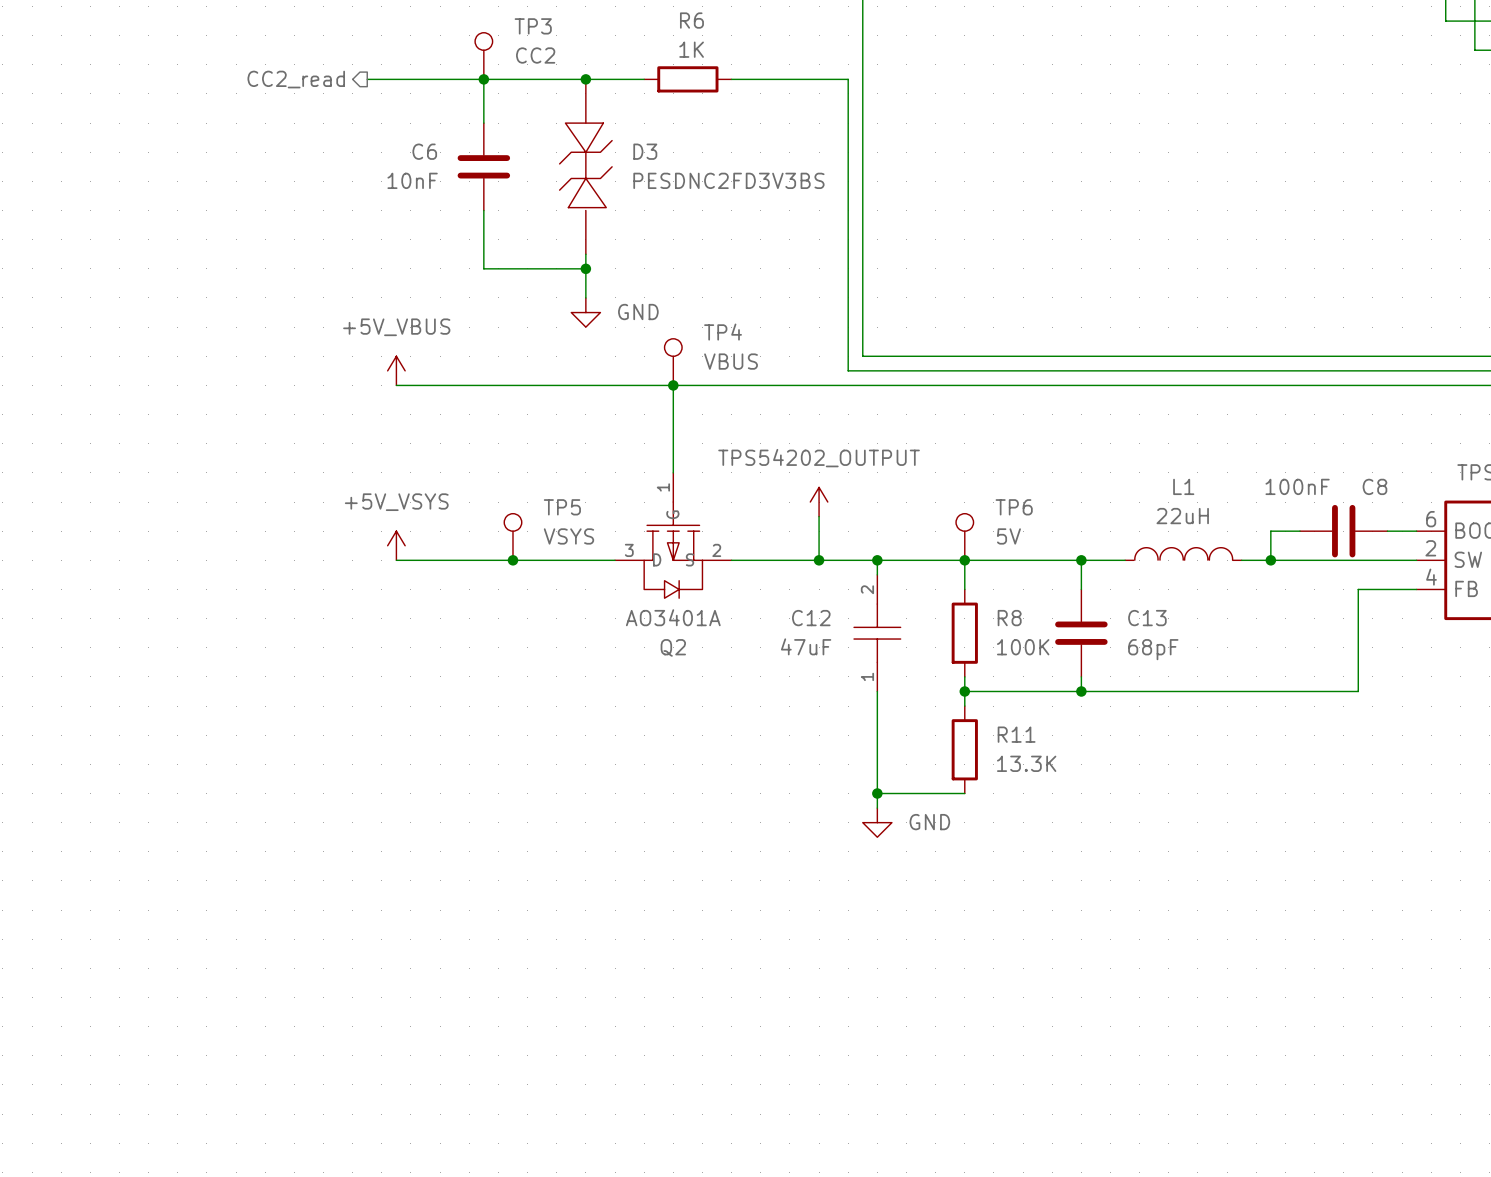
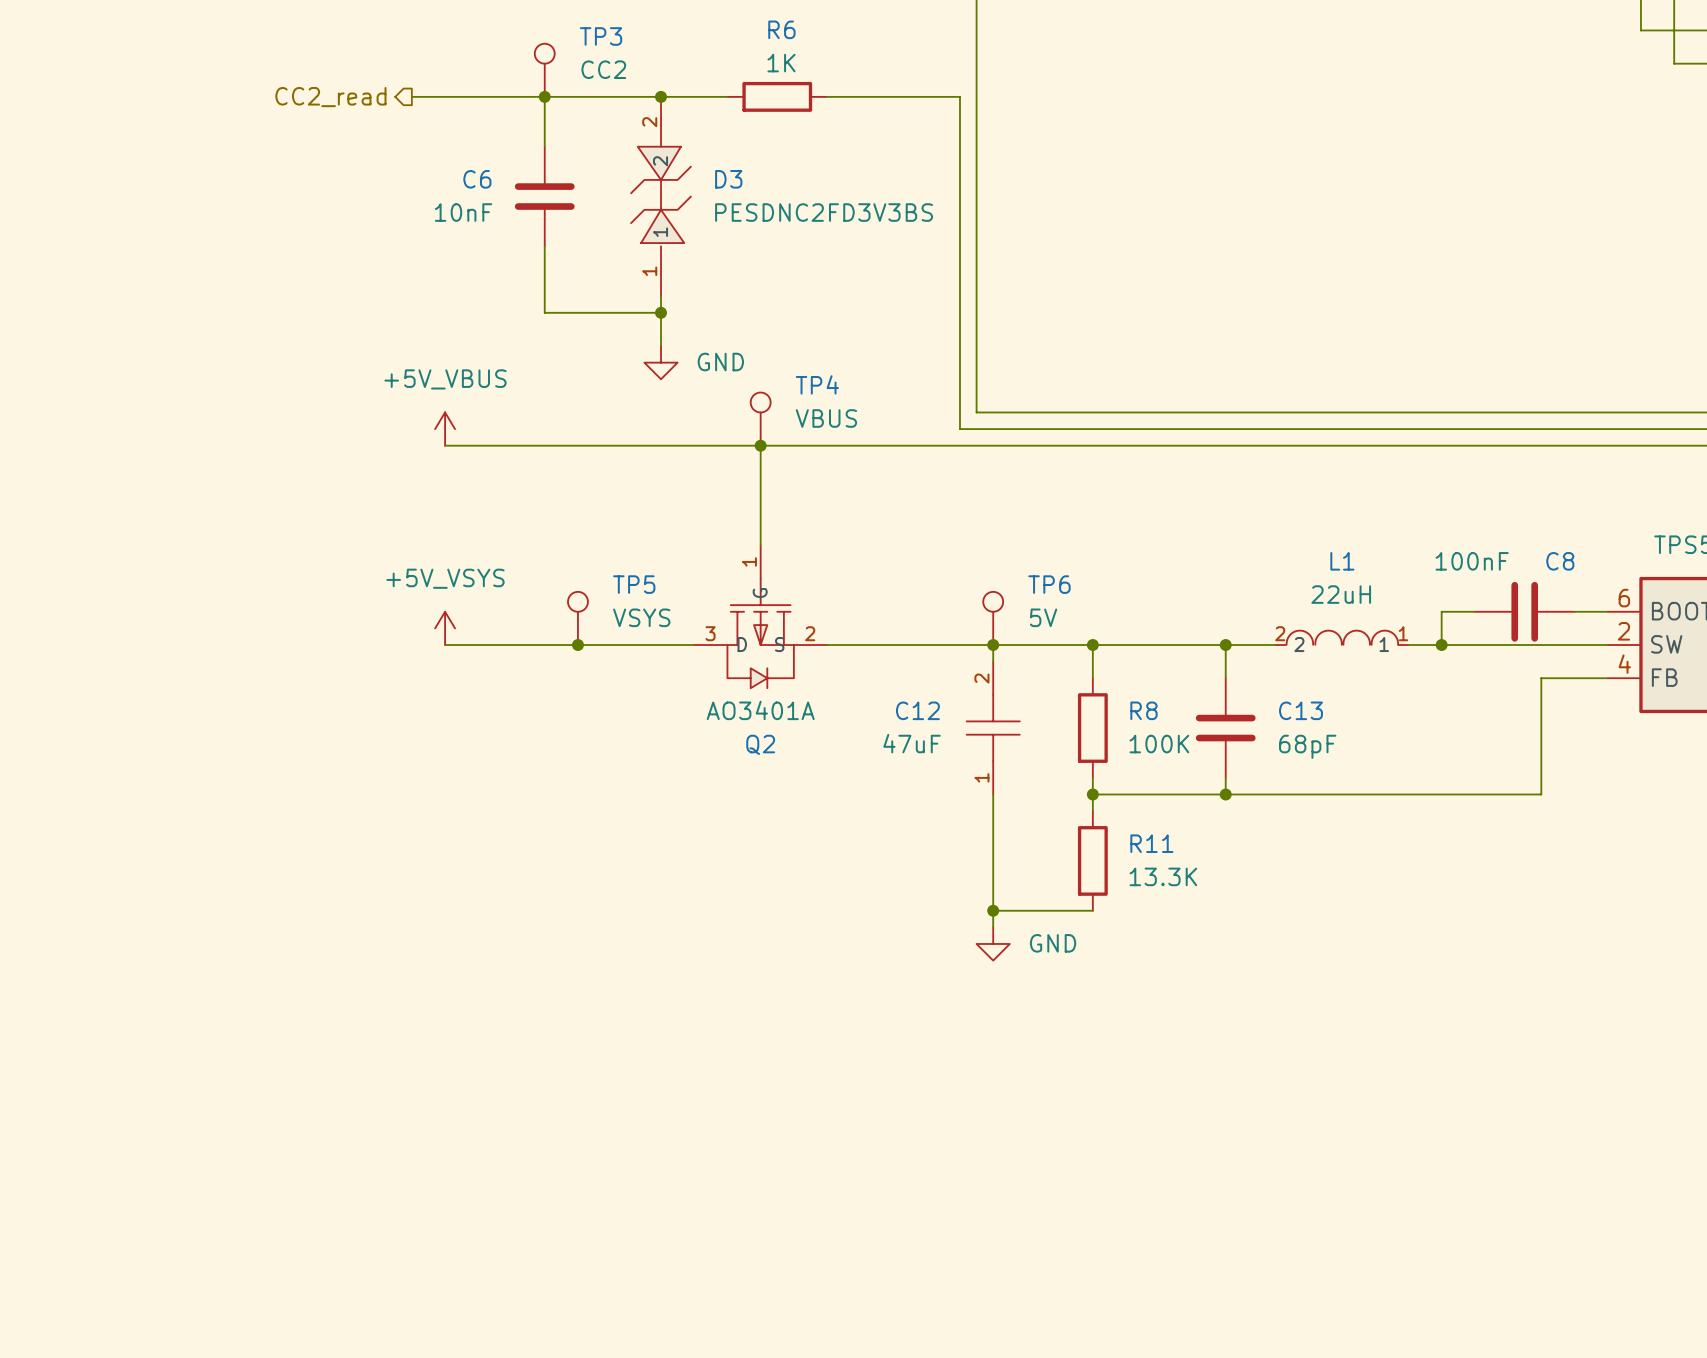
D3 pin number: none -> 2 (649, 122)
D3 pin name: none -> 2 (660, 161)
D3 pin name: none -> 1 (660, 232)
D3 pin number: none -> 1 (649, 271)
power symbol: TPS54202_OUTPUT (819, 502) -> none
wire: (819, 516) (819, 560) -> none
TP6 position: (964, 537) -> (993, 618)
L1 pin number: none -> 2 (1280, 633)
L1 pin number: none -> 1 (1403, 633)
L1 pin name: none -> 2 (1299, 644)
L1 pin name: none -> 1 (1384, 644)
junction: (819, 560) -> none

